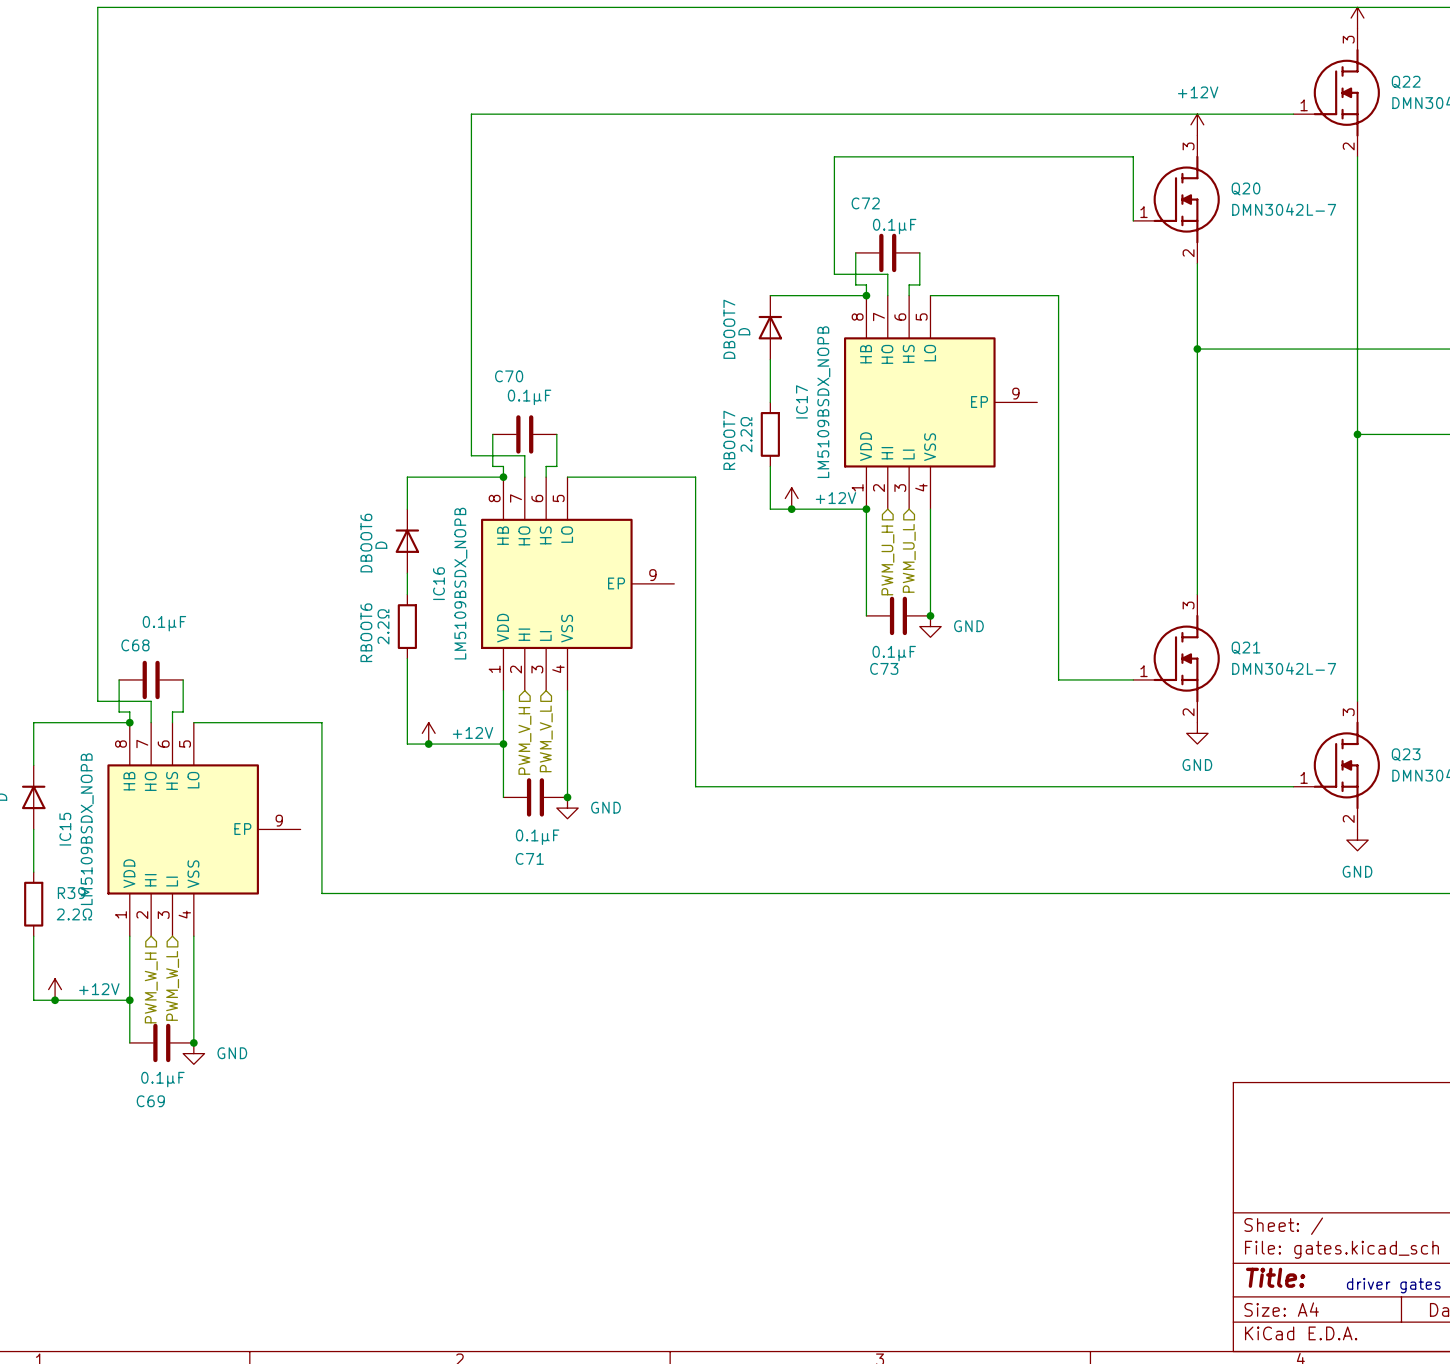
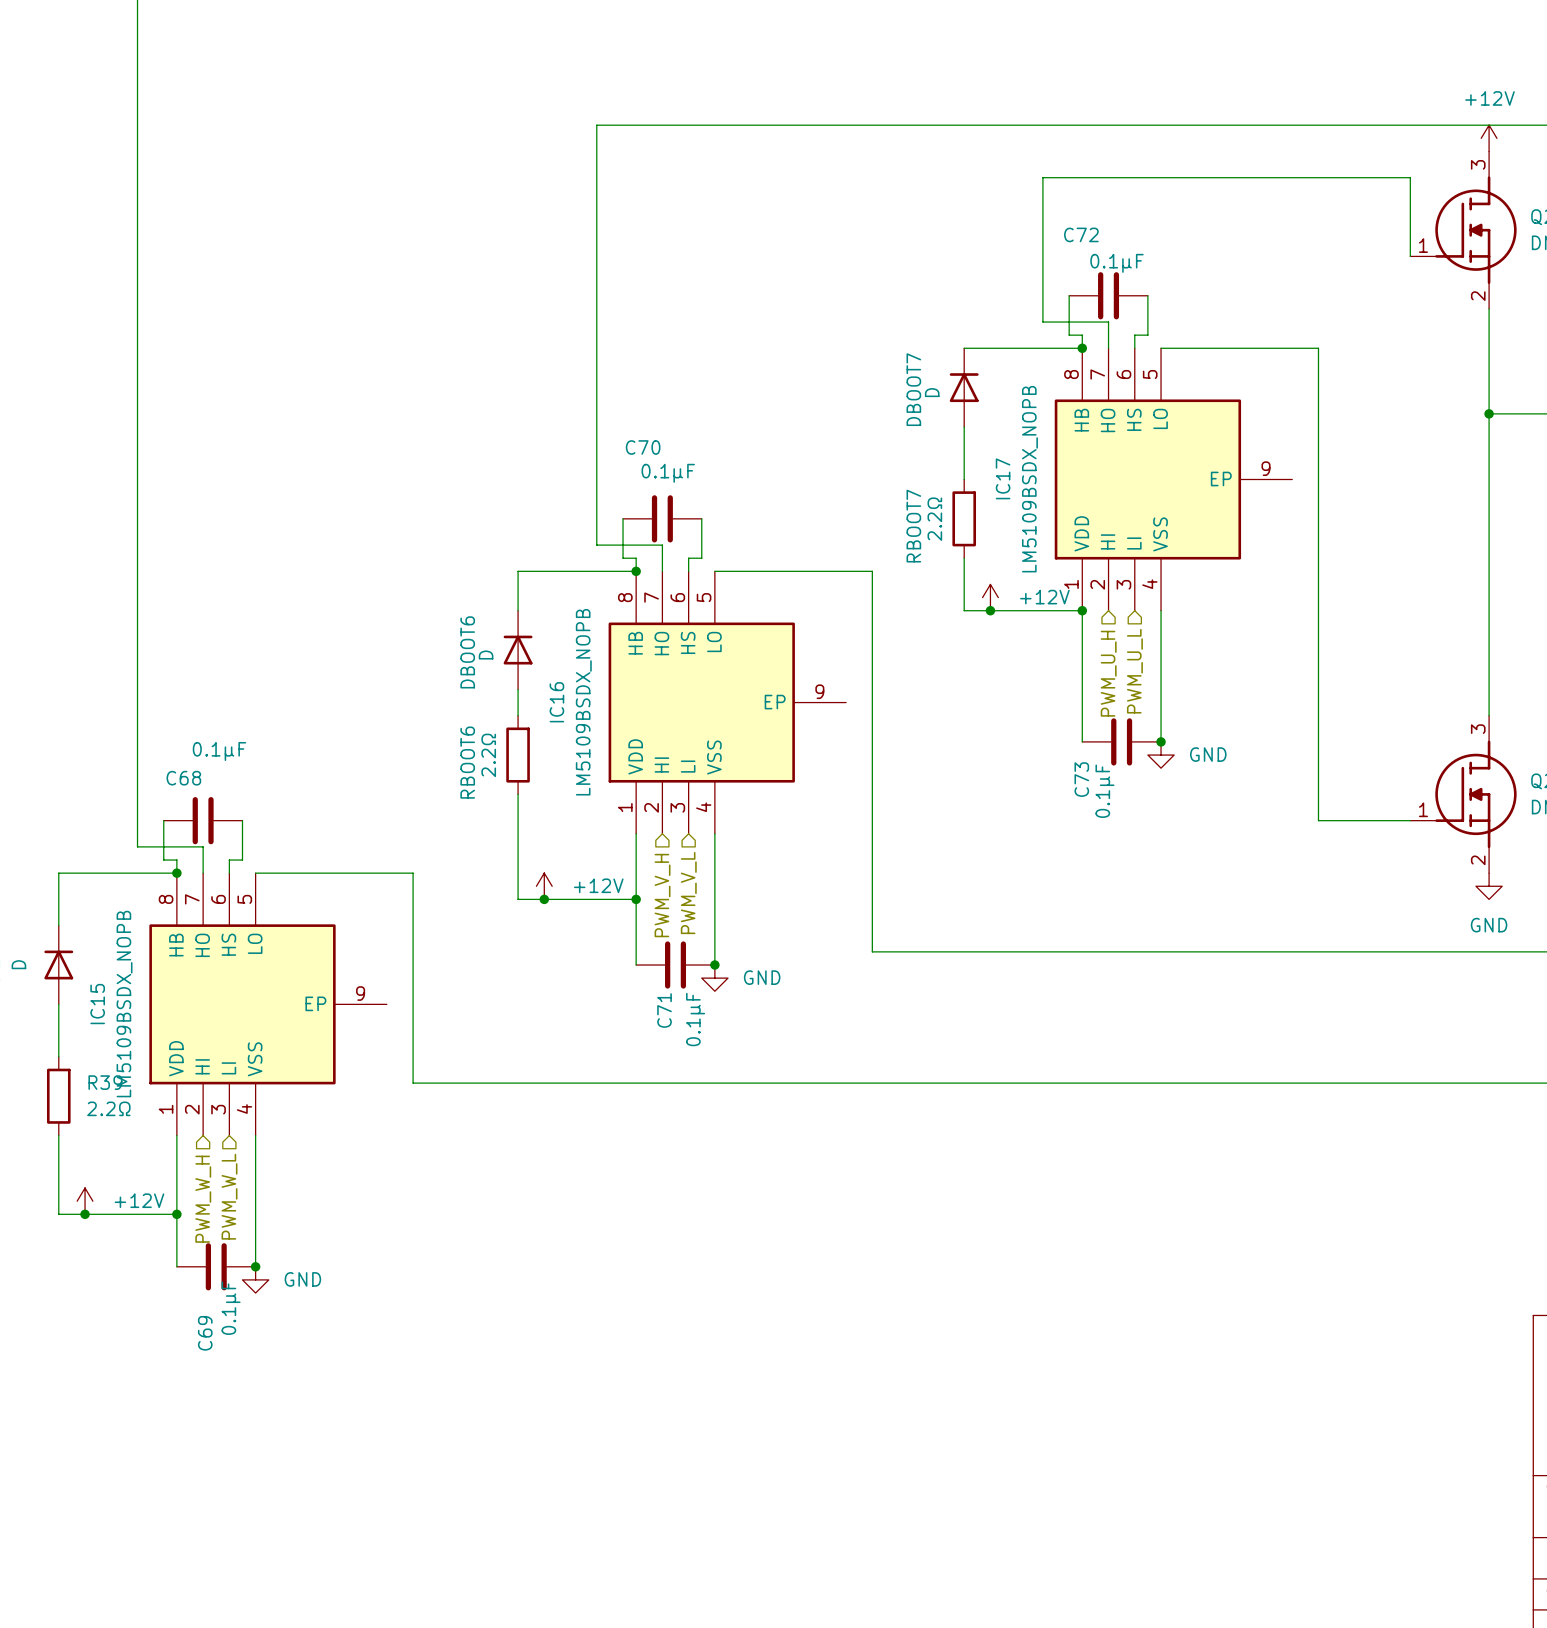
C73 value rotation: 0° (894, 653) -> 90° counterclockwise (1104, 791)
C73 name rotation: 0° (884, 668) -> 90° counterclockwise (1081, 779)
C71 value rotation: 0° (537, 837) -> 90° counterclockwise (695, 1019)
C71 name rotation: 0° (529, 858) -> 90° counterclockwise (664, 1010)
C69 value rotation: 0° (162, 1079) -> 90° counterclockwise (231, 1308)
C69 name rotation: 0° (150, 1101) -> 90° counterclockwise (205, 1333)

